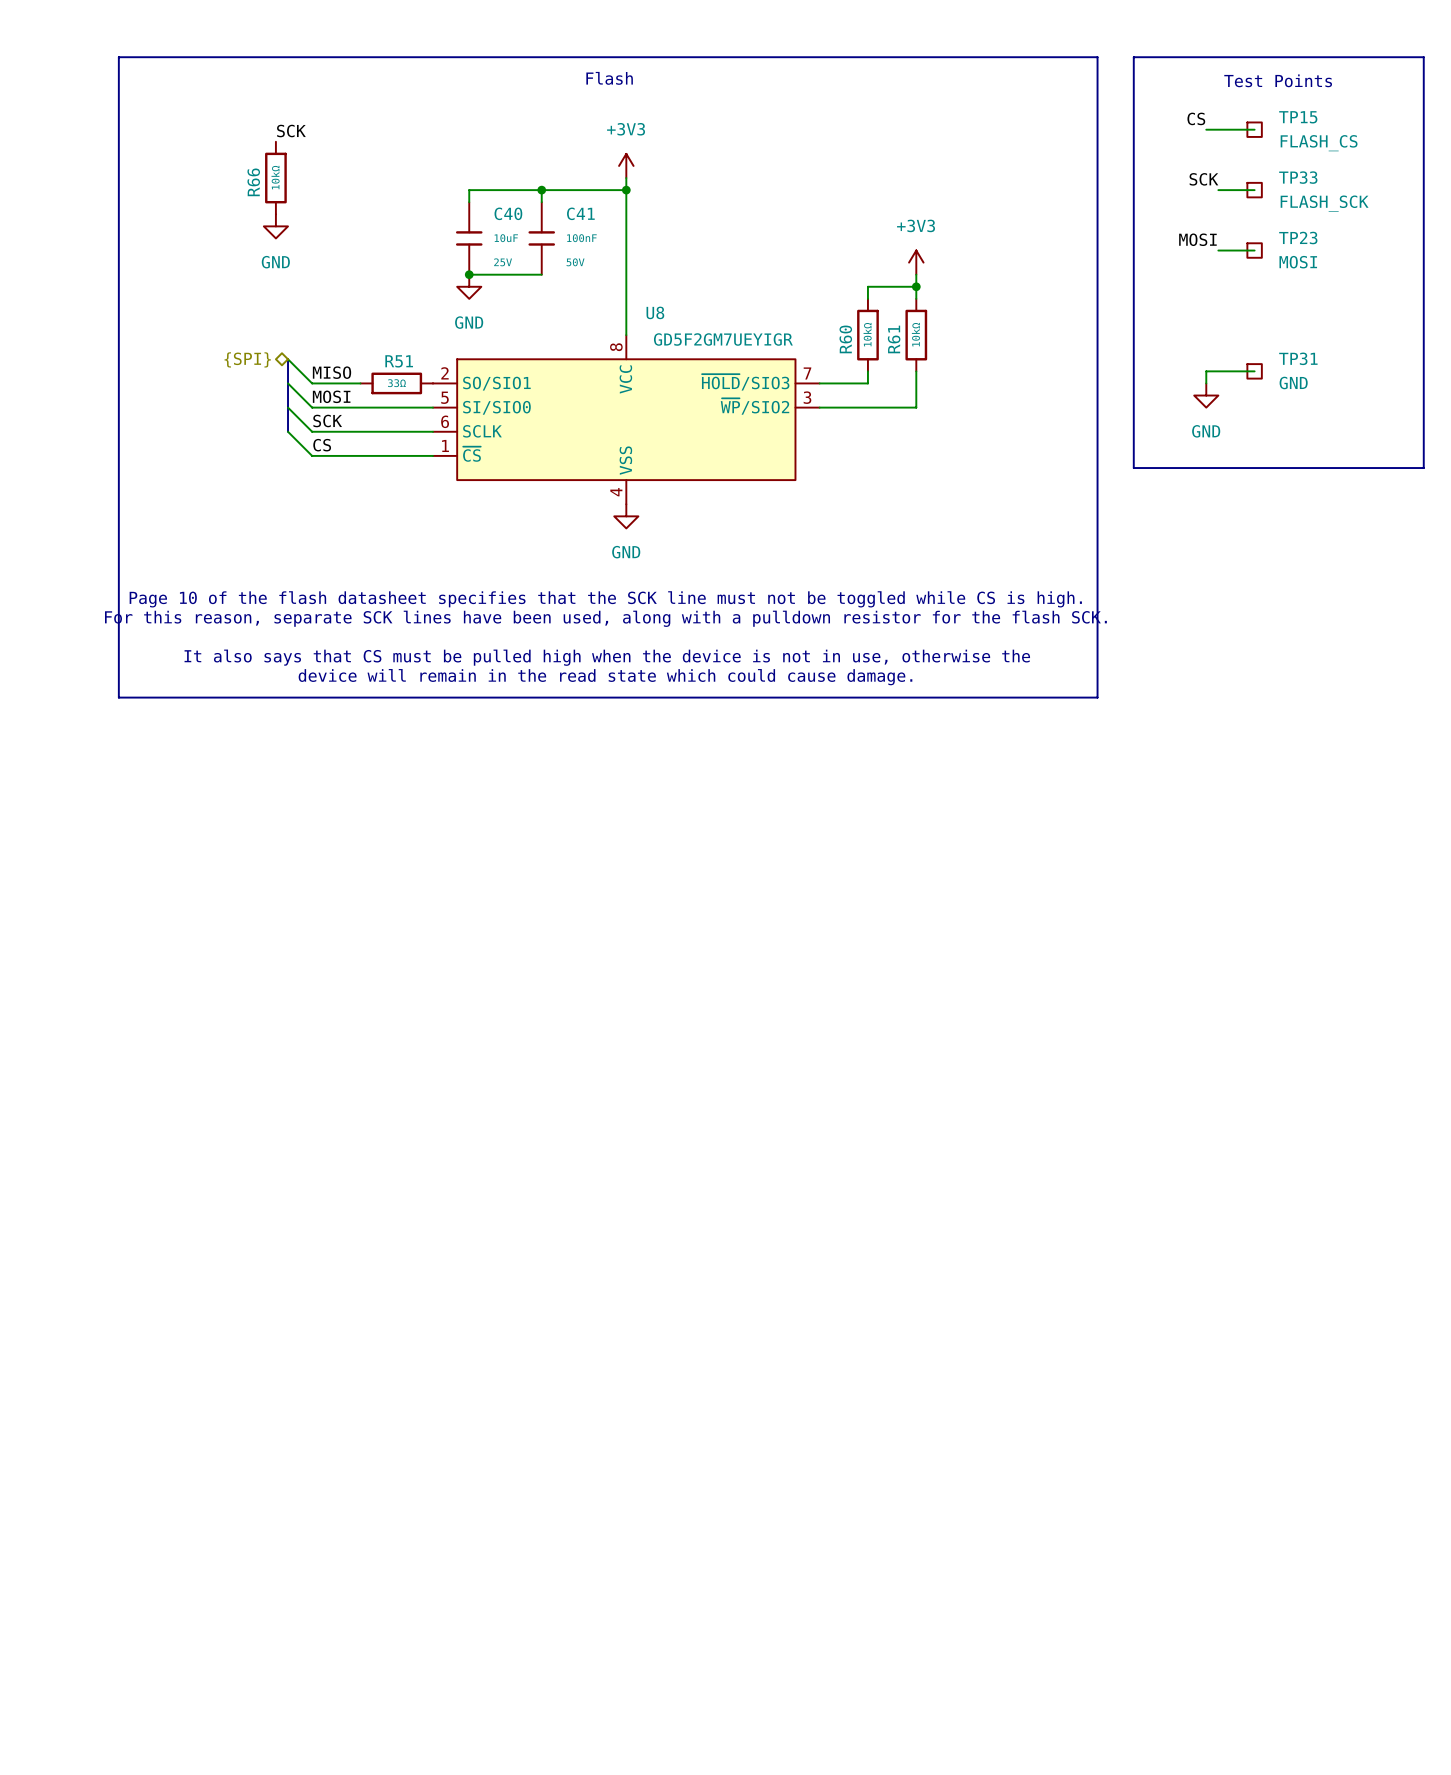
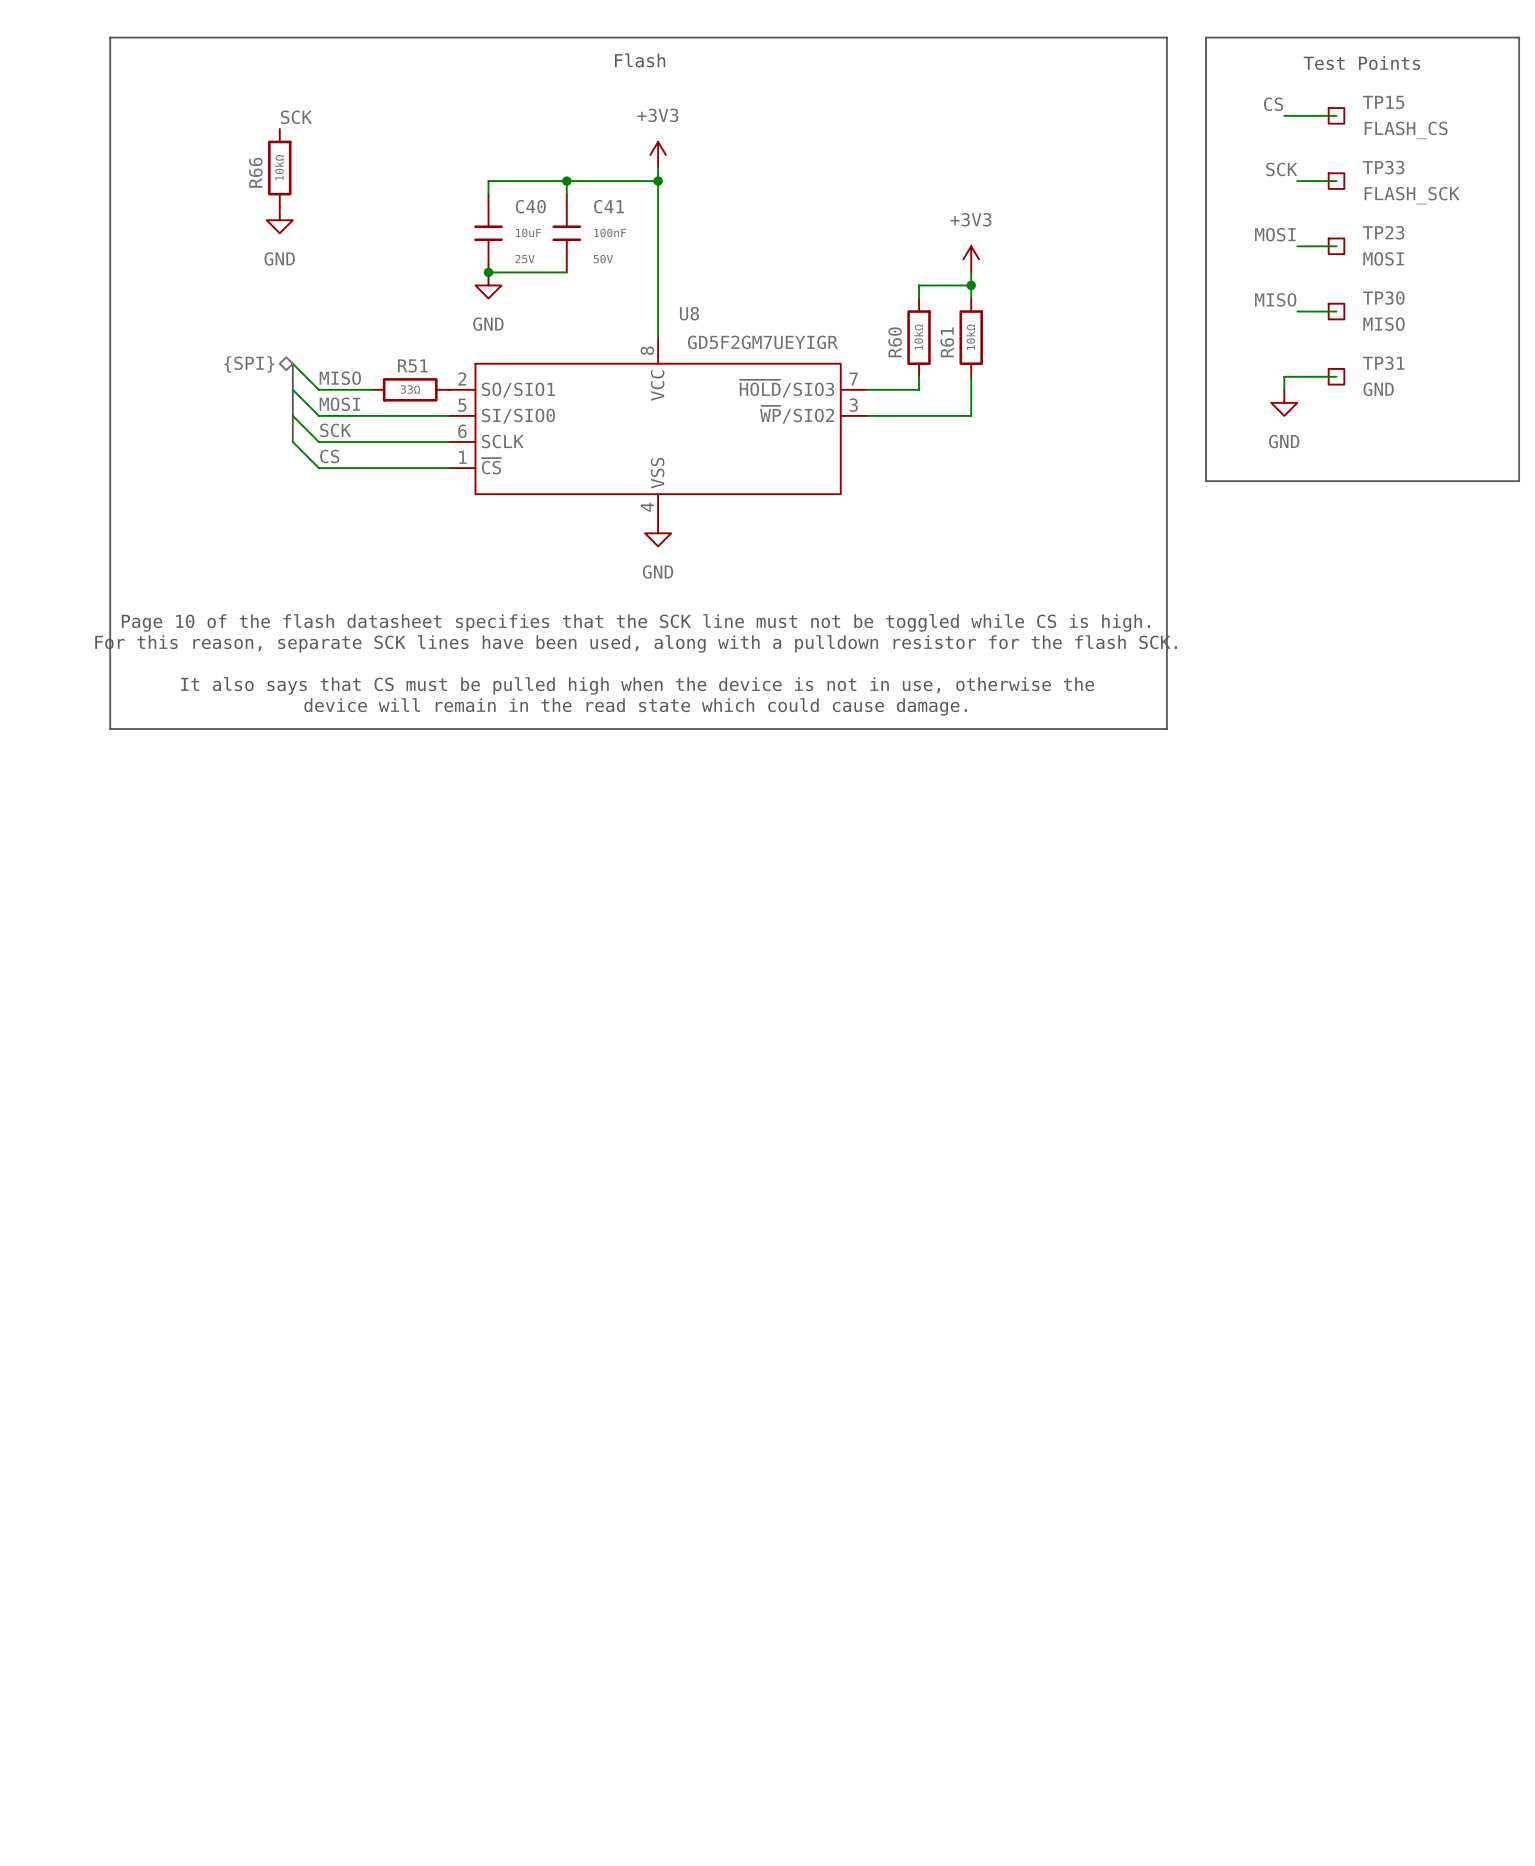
label: none -> MISO (1275, 299)
wire: none -> (1297, 311) (1336, 311)
TP30: none -> MISO (1336, 311)

